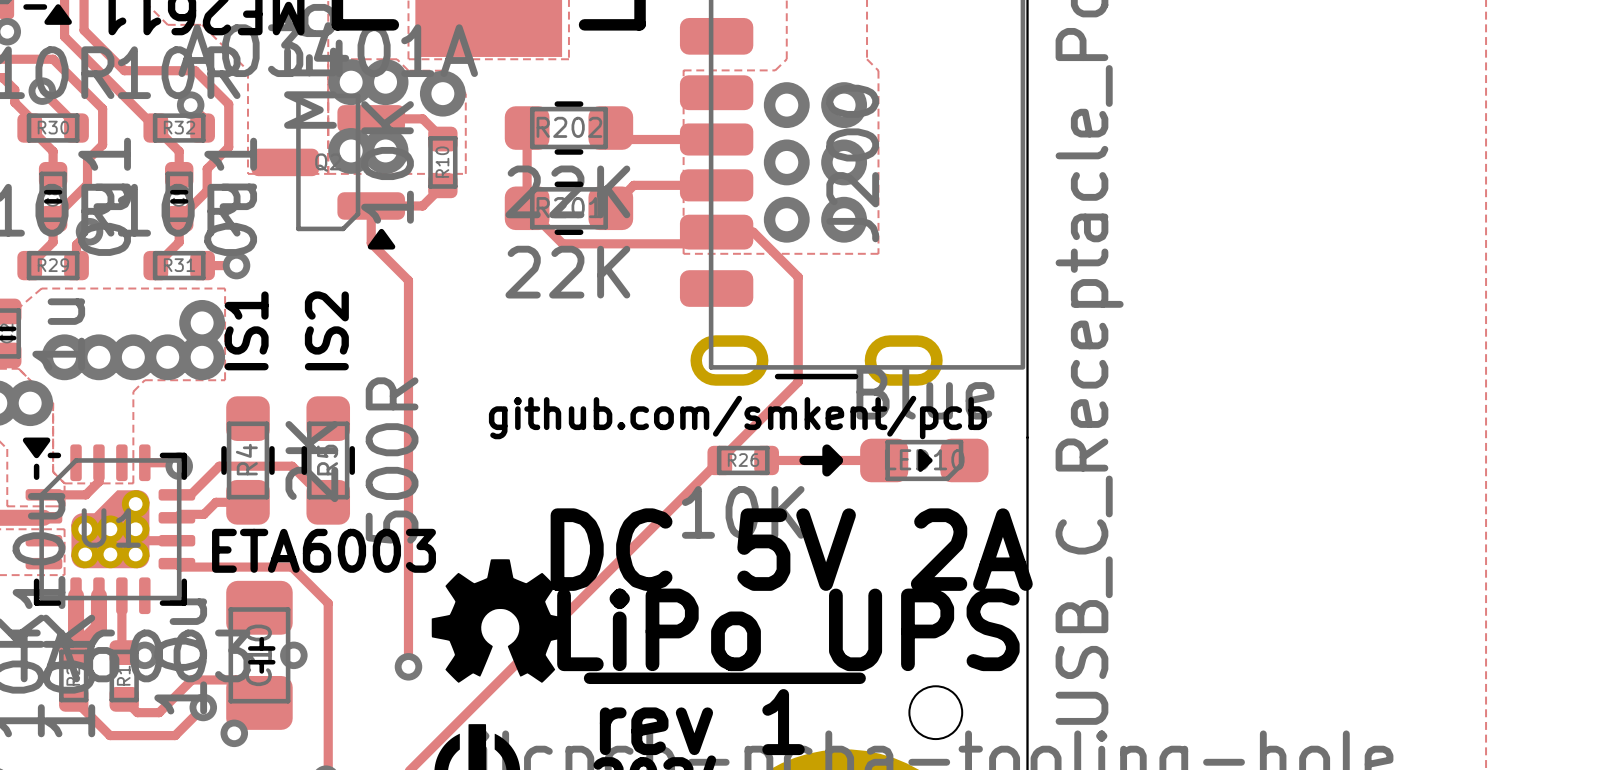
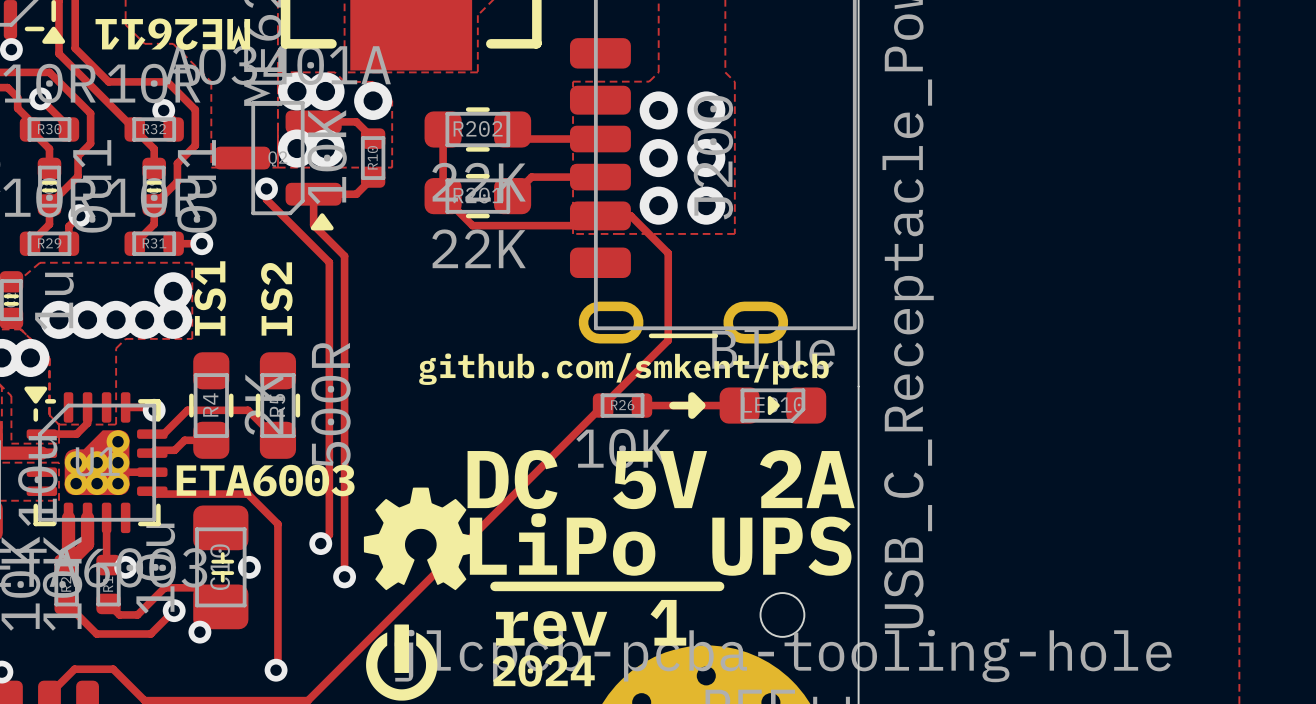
track: none -> (266, 188) (266, 199) (329, 262) (329, 535) (320, 543)
via: none -> (266, 188)
via: none -> (320, 543)

